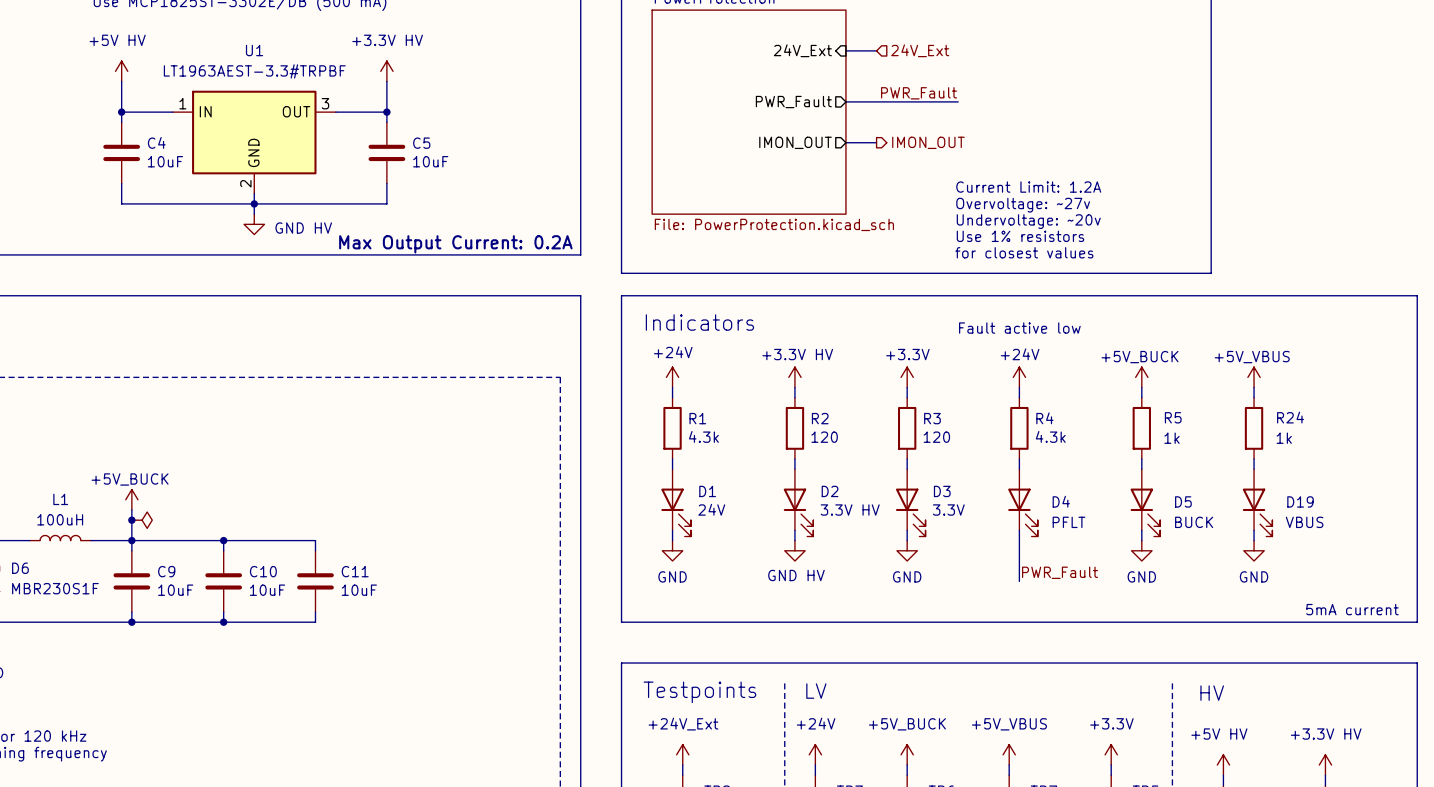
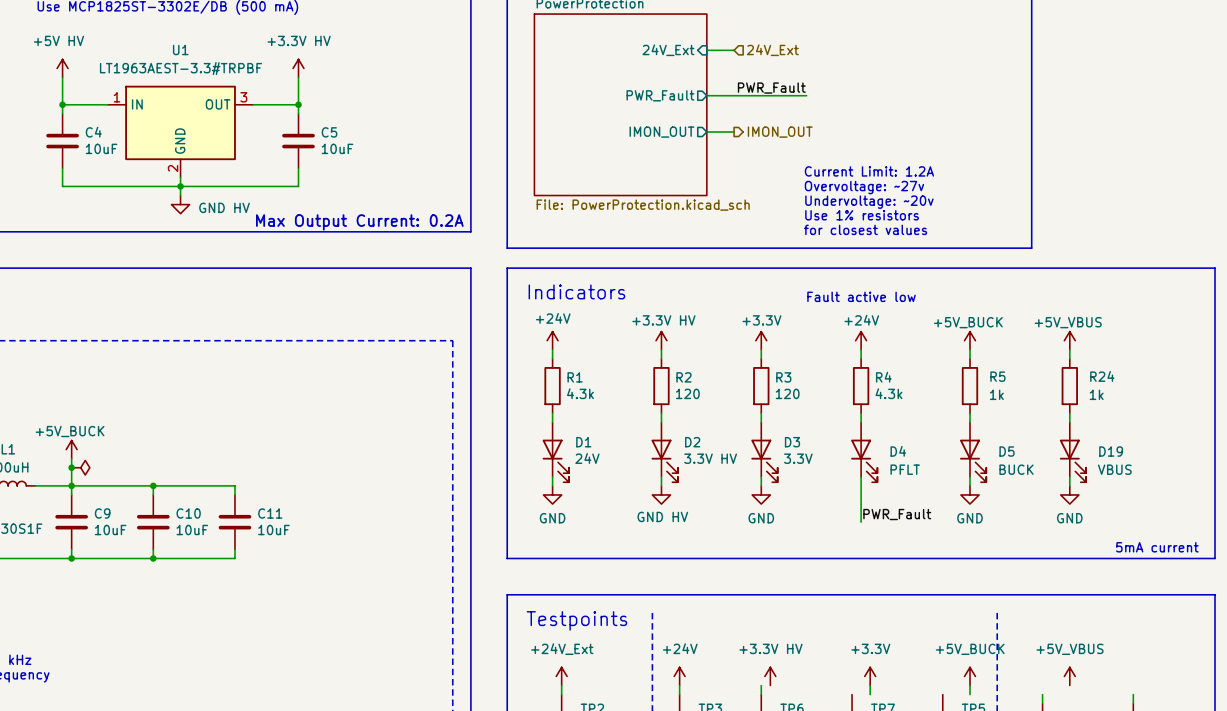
text: LV (816, 691) -> none
text: HV (1212, 693) -> none
power symbol: +5V_BUCK (907, 754) -> none
power symbol: none -> +3.3V HV (770, 676)
power symbol: +5V_VBUS (1009, 754) -> none
power symbol position: +3.3V (1111, 754) -> +3.3V (870, 676)
power symbol: none -> +5V_BUCK (969, 676)
power symbol: none -> +5V_VBUS (1069, 676)
wire: (1009, 765) (1009, 775) -> (870, 685) (870, 694)
wire: (1111, 765) (1111, 775) -> (969, 685) (969, 694)
power symbol: +5V HV (1223, 765) -> none
power symbol: +3.3V HV (1325, 765) -> none

